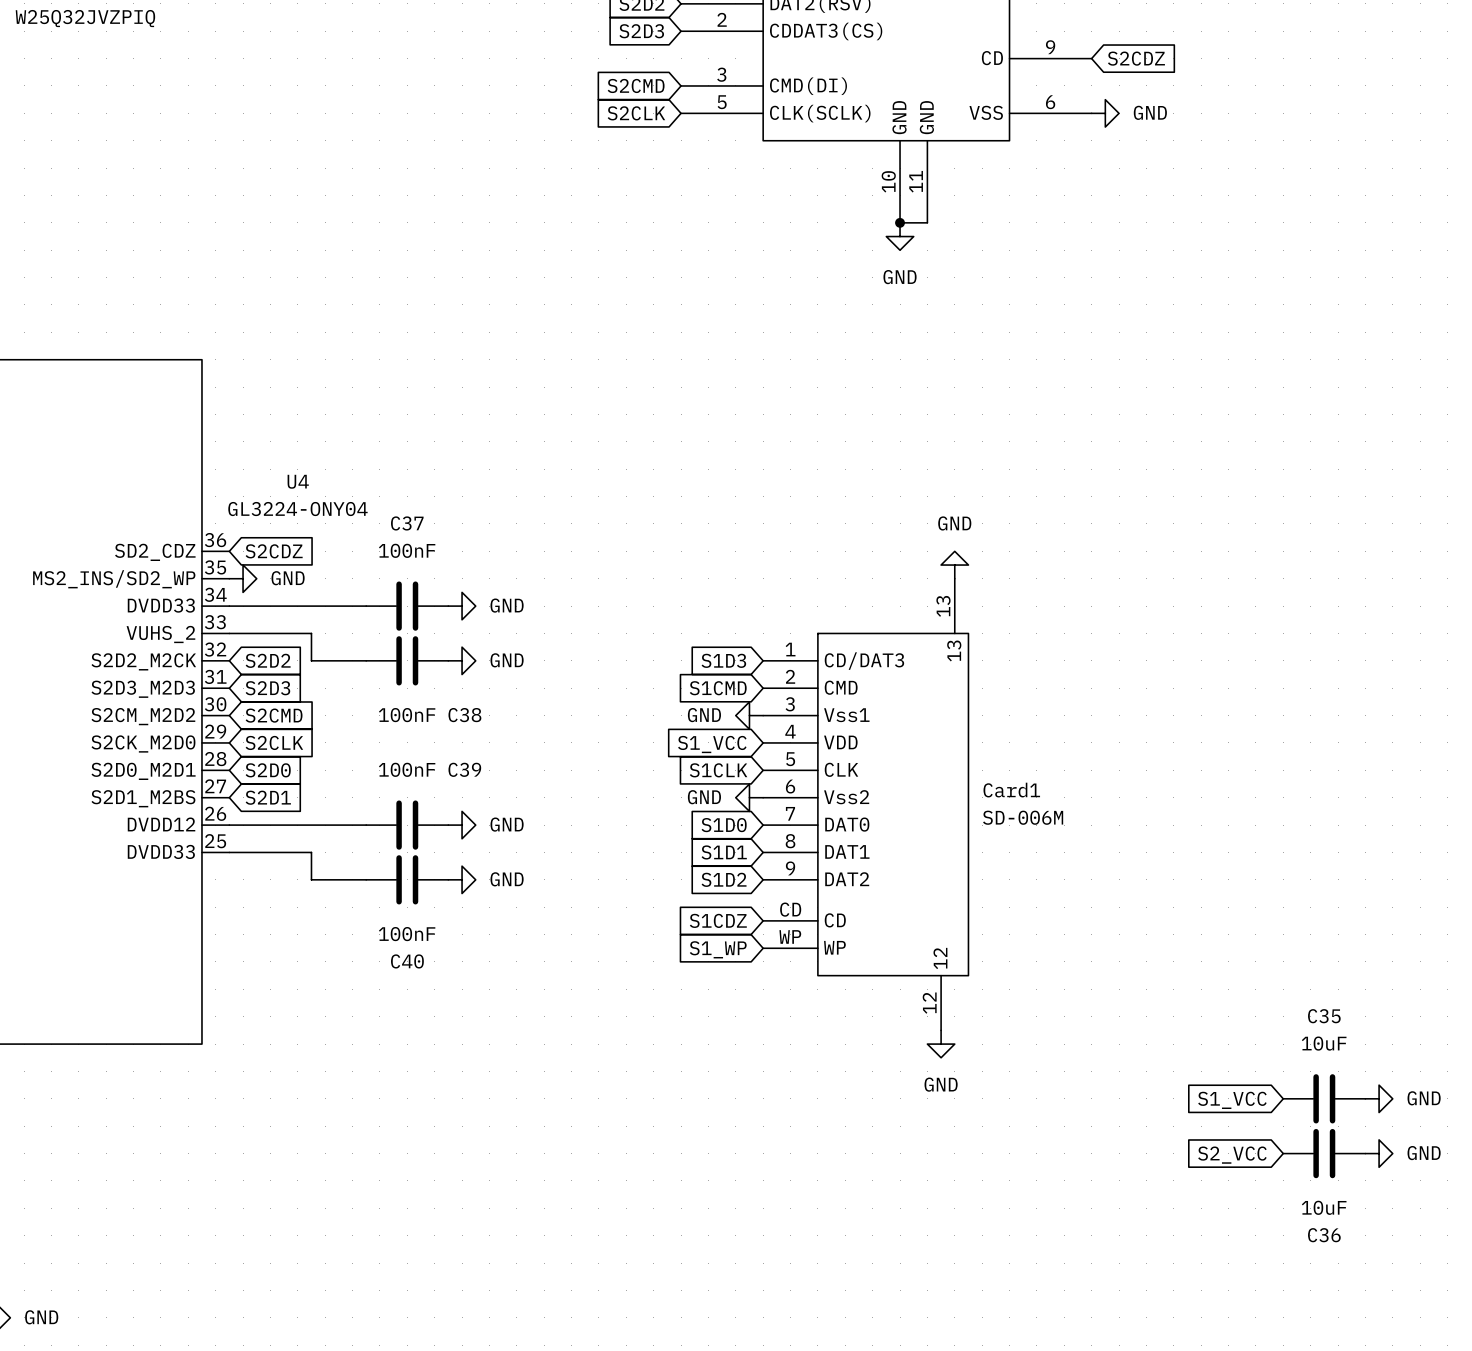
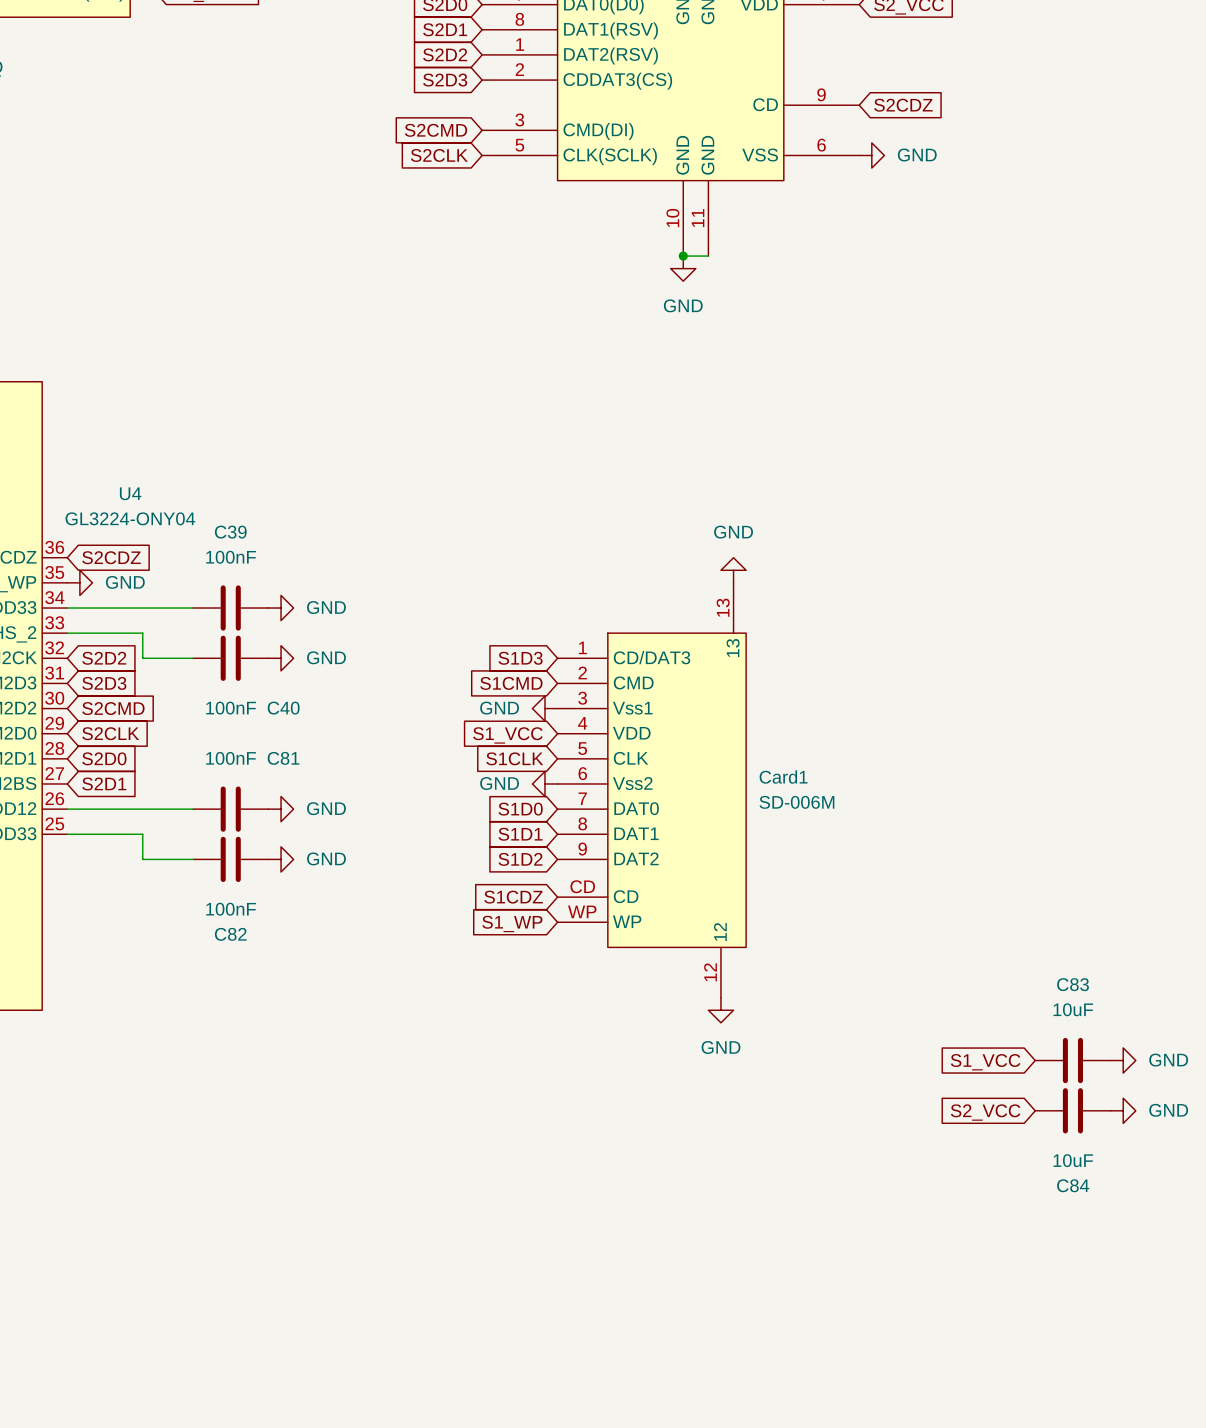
C37 name: C37 (407, 523) -> C39 (230, 532)
C38 name: C38 (464, 715) -> C40 (283, 708)
C39 name: C39 (464, 769) -> C81 (283, 758)
C40 name: C40 (407, 961) -> C82 (230, 934)
C35 name: C35 (1324, 1016) -> C83 (1073, 984)
C36 name: C36 (1324, 1235) -> C84 (1073, 1185)

